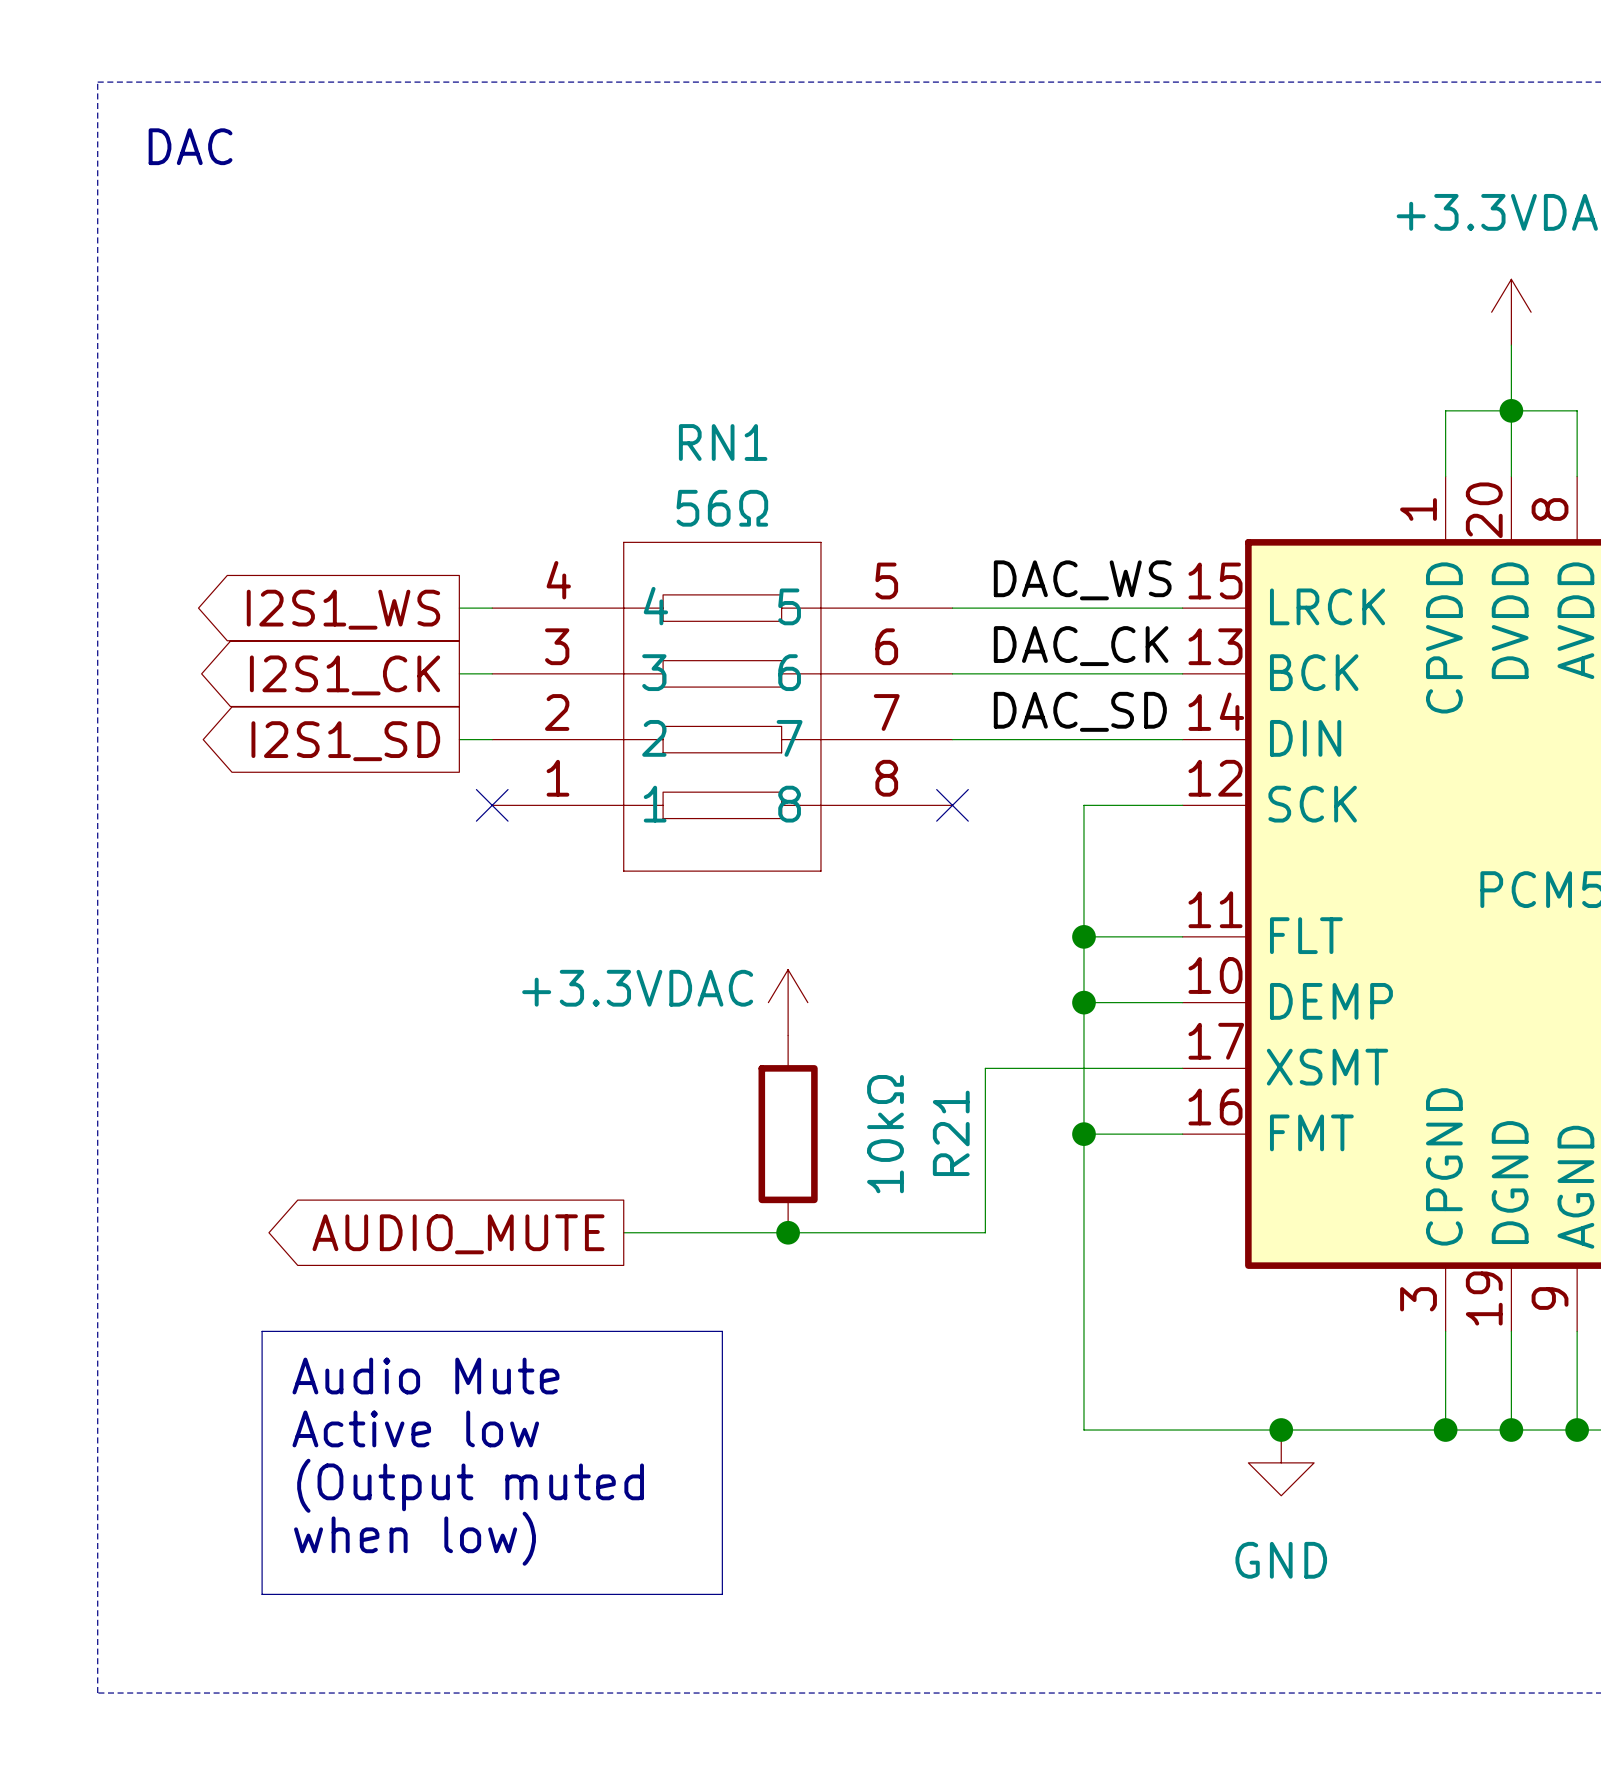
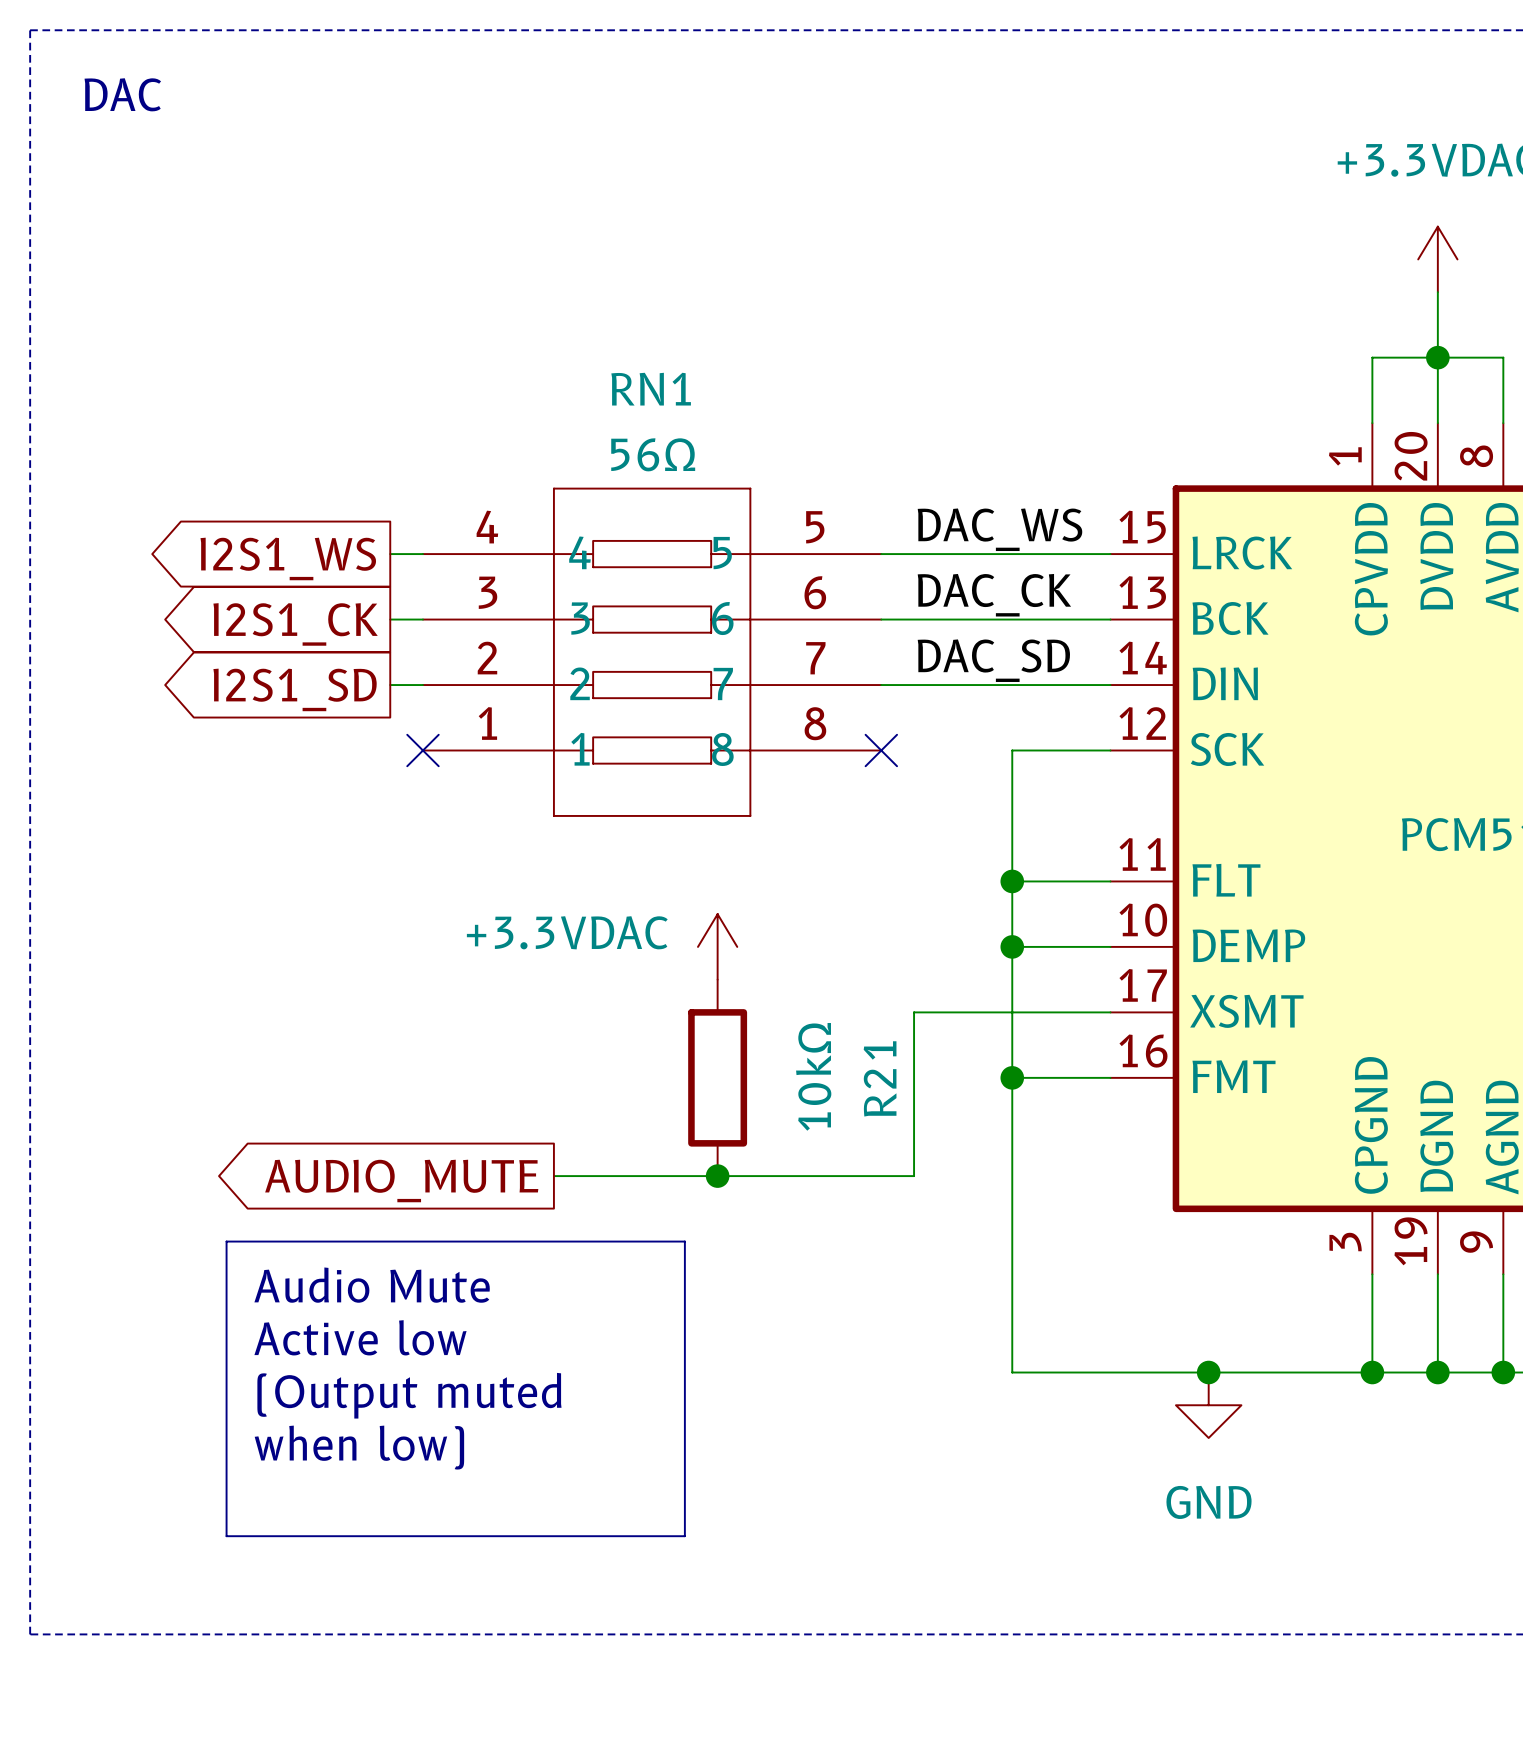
text position: Audio Mute (425, 1376) -> Audio Mute (372, 1285)
text position: Active low (415, 1428) -> Active low (360, 1337)
text position: (Output muted (470, 1485) -> (Output muted (409, 1395)
text position: when low) (414, 1538) -> when low) (359, 1447)
line: (294, 1594) (262, 1594) (262, 1331) (722, 1331) (722, 1594) -> (226, 1536) (226, 1241) (684, 1241) (684, 1536) (652, 1536)

